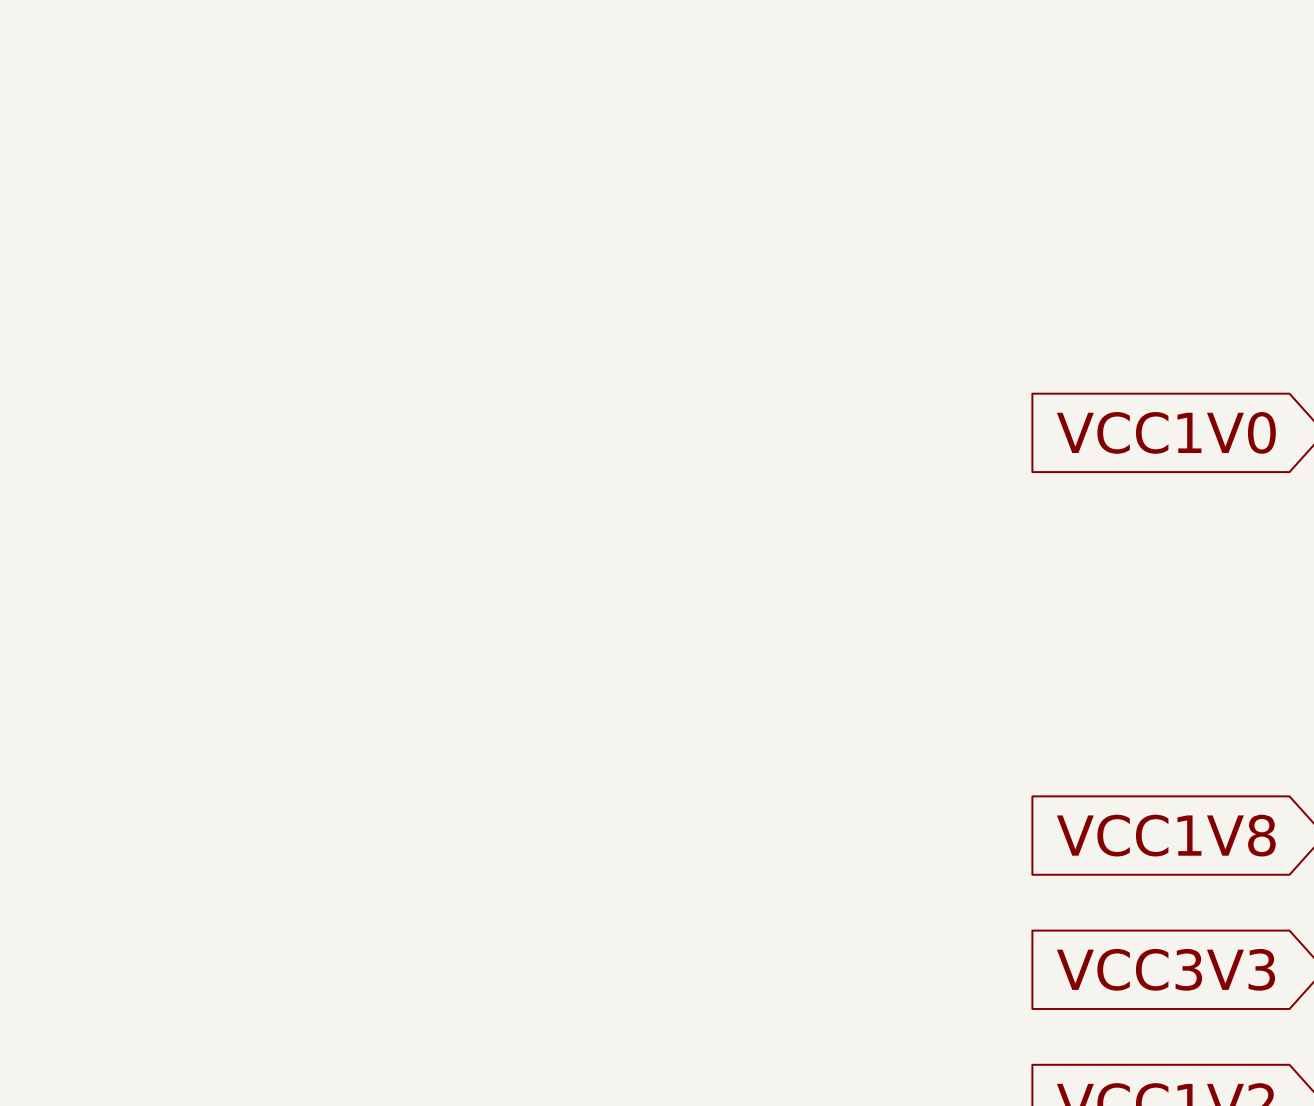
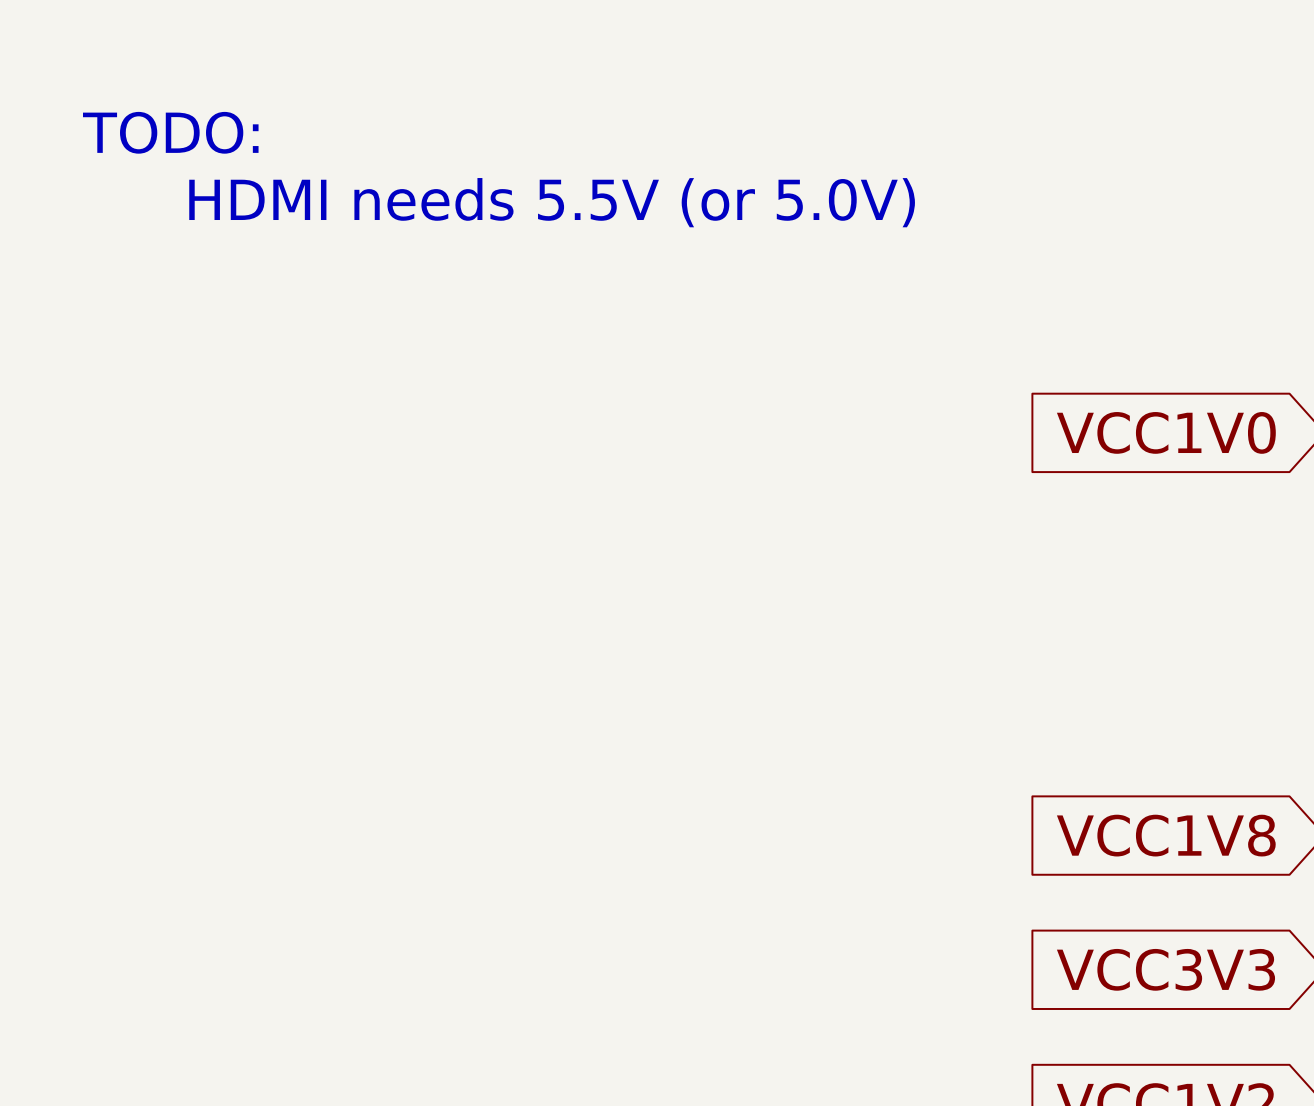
text: none -> TODO: (170, 132)
text: none -> HDMI needs 5.5V (or 5.0V) (552, 202)

